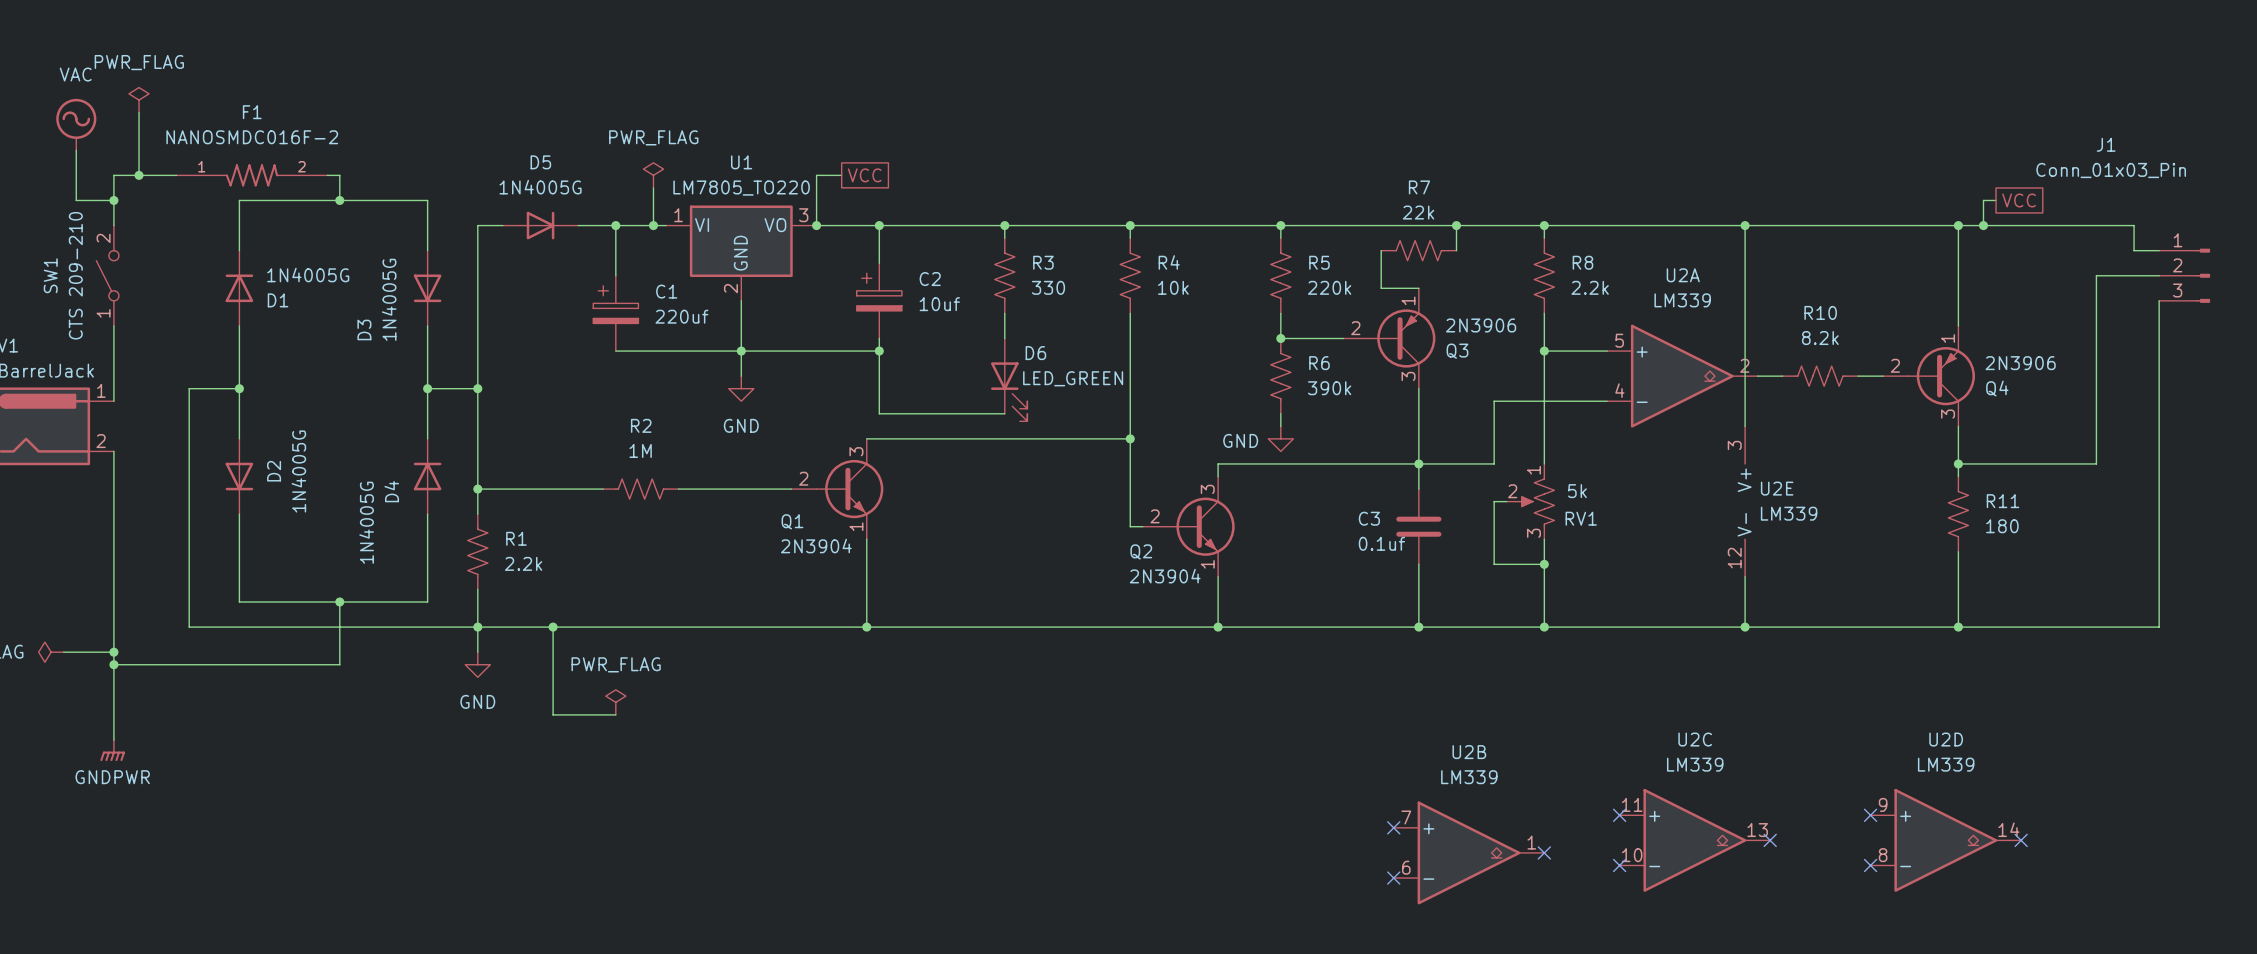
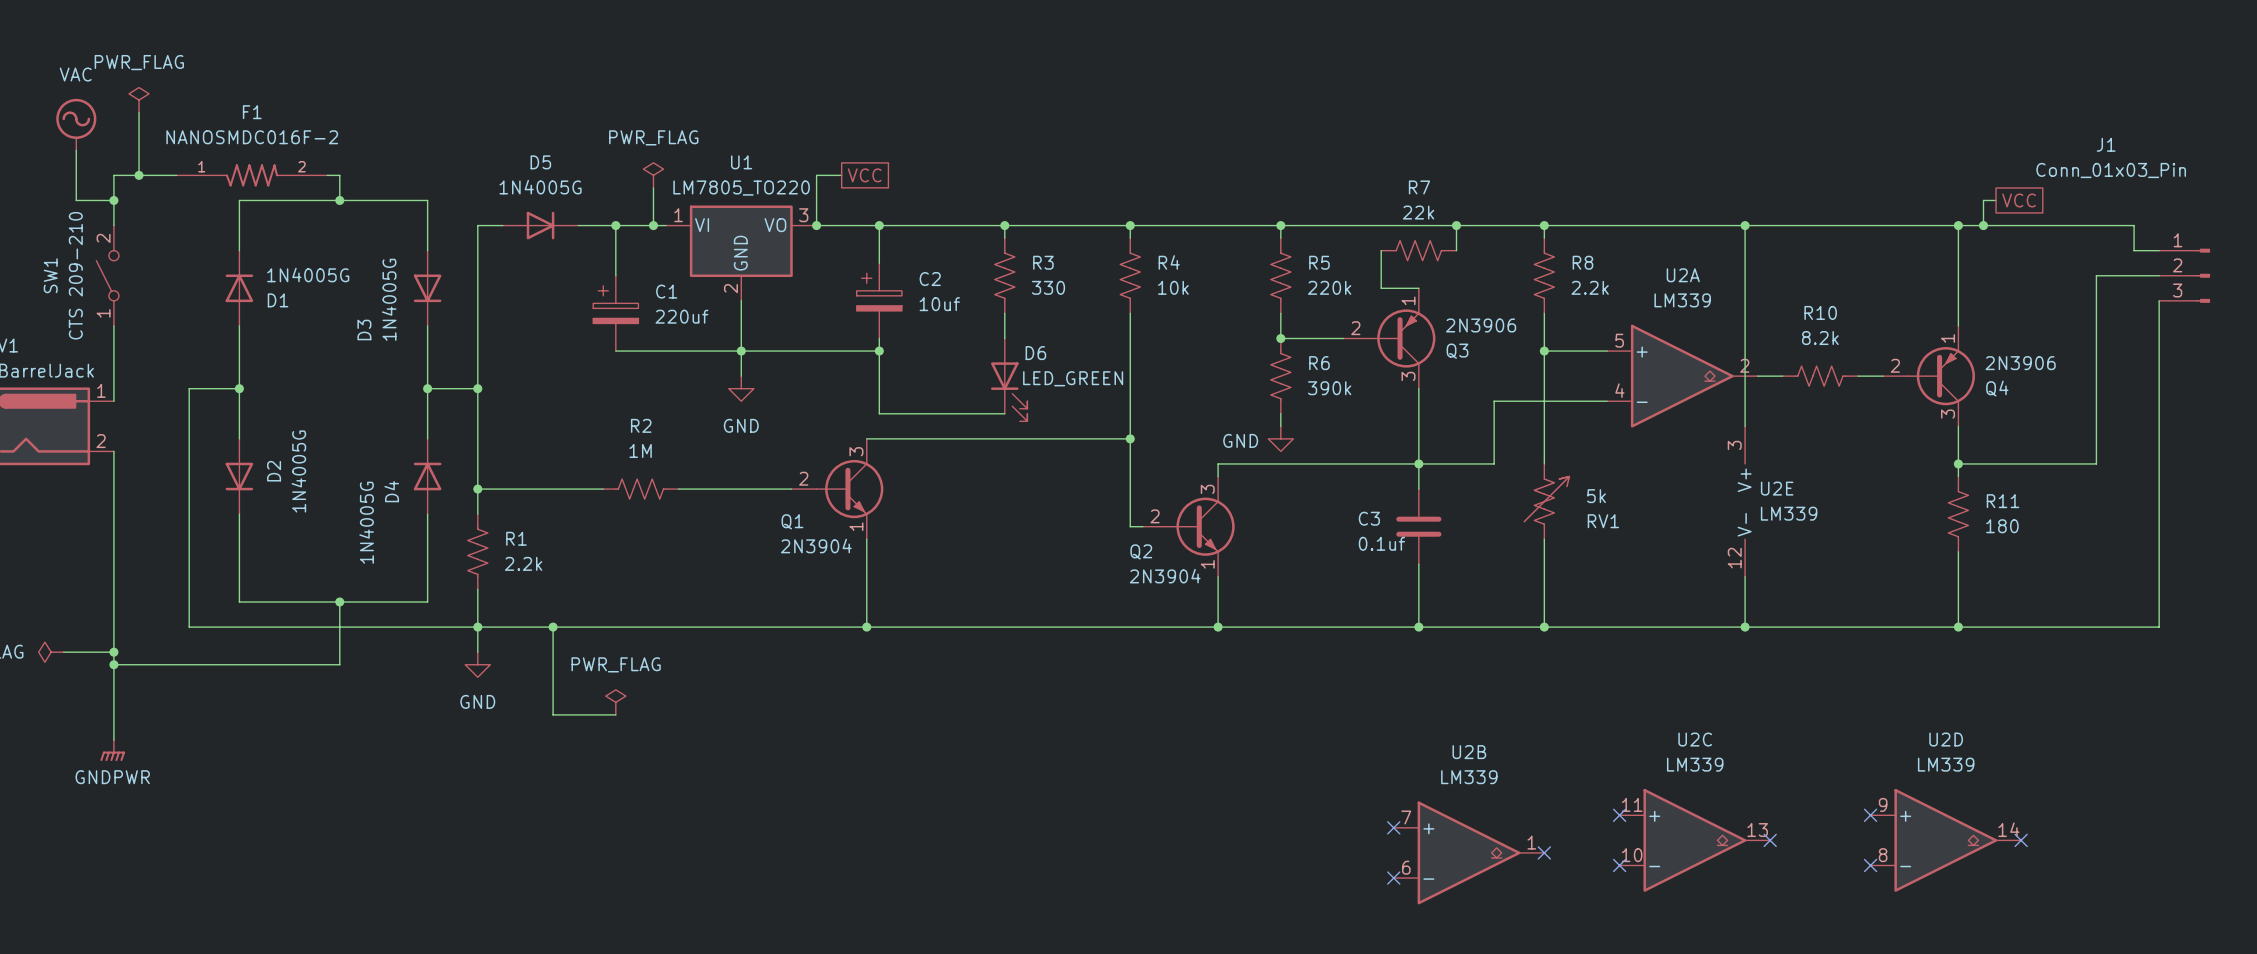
RV1 symbol: [1506, 463, 1555, 540] -> [1523, 463, 1571, 540]
wire: (1506, 501) (1494, 501) (1494, 564) (1544, 564) -> none
junction: (1544, 564) -> none

